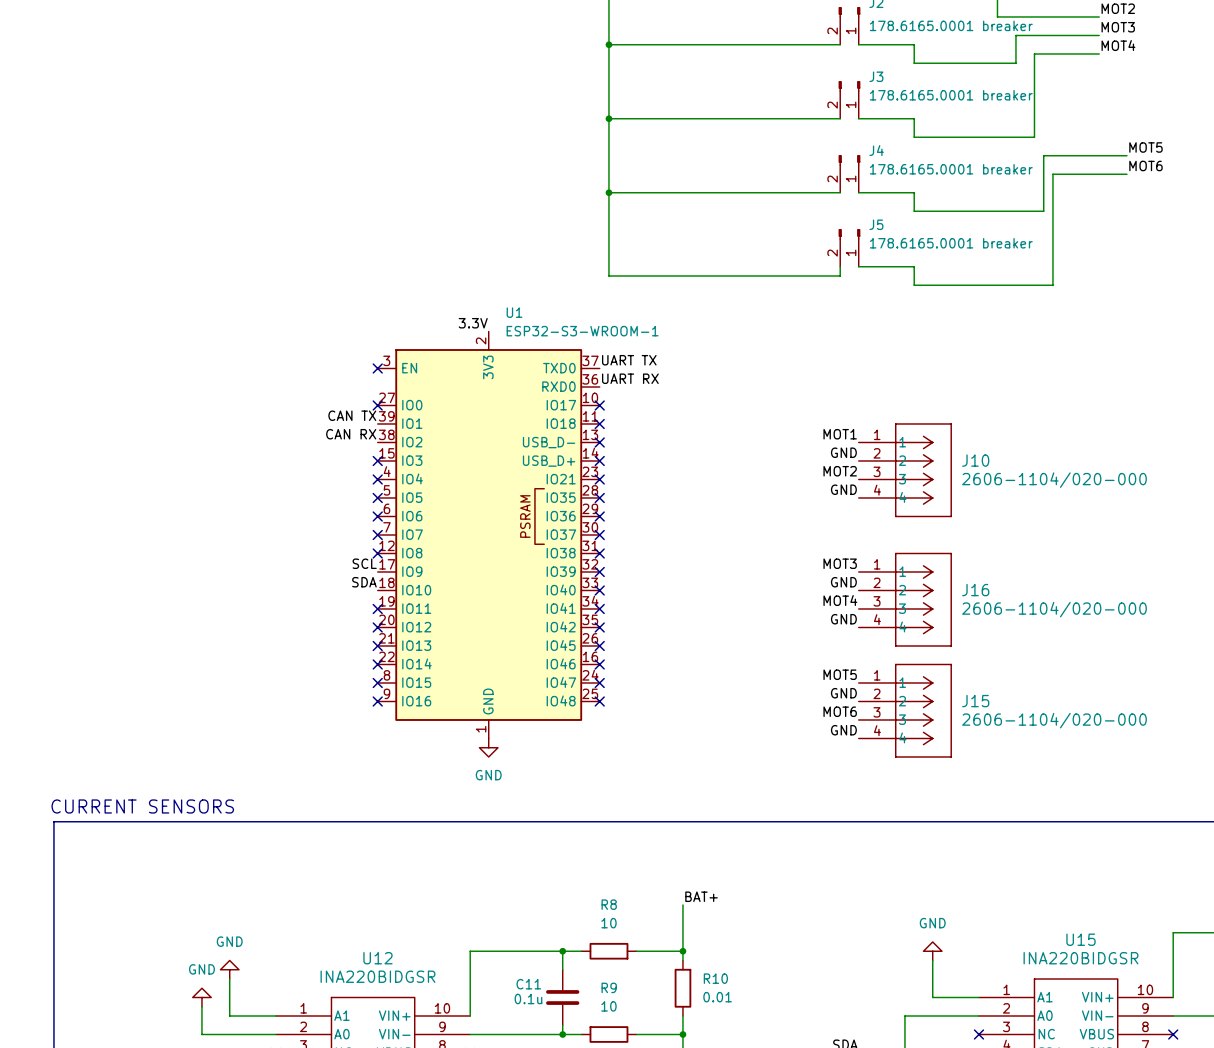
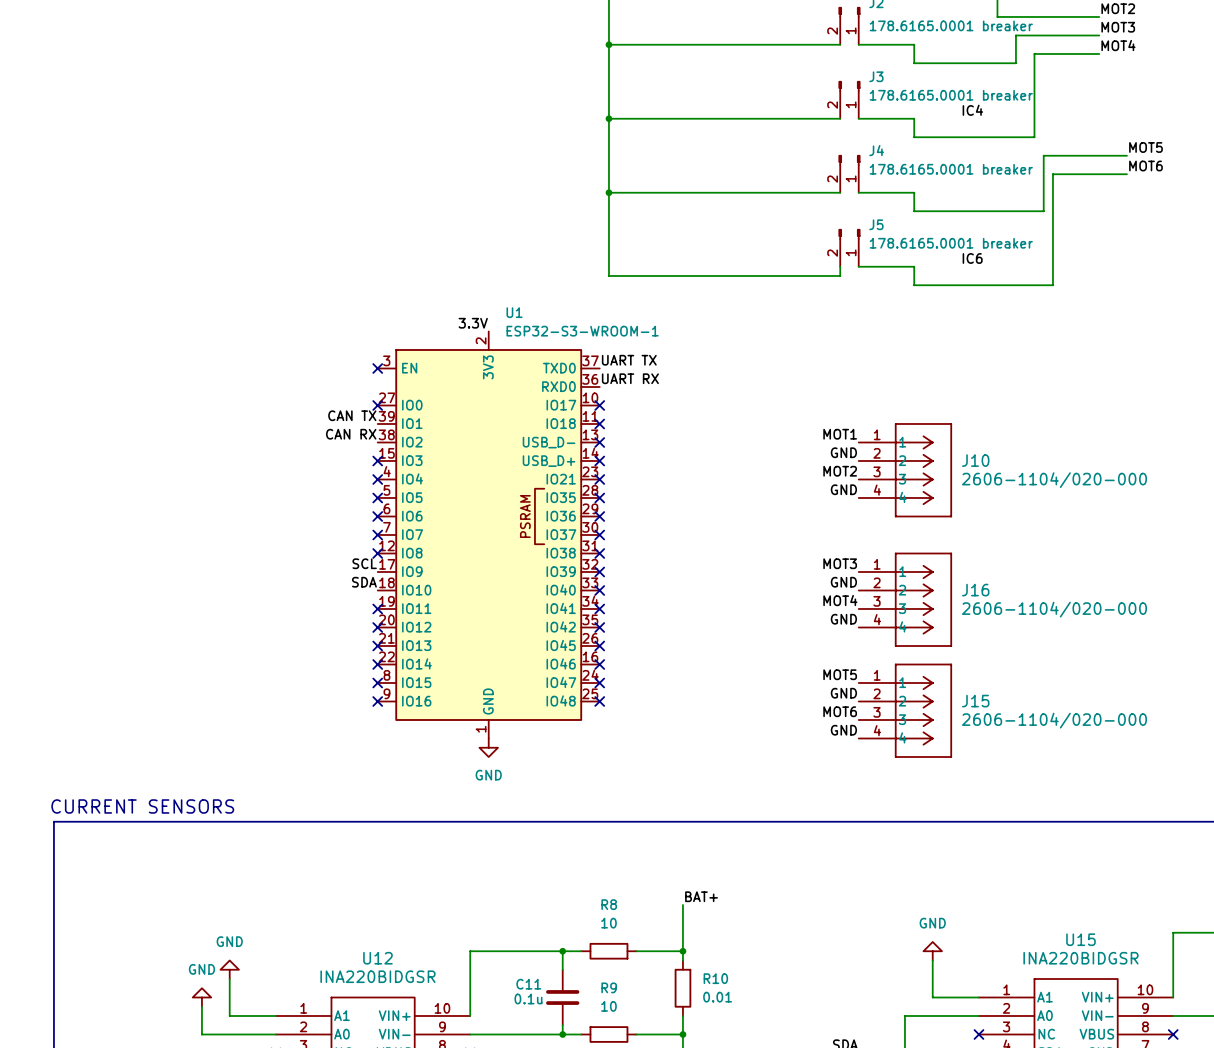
label: none -> IC4 (972, 110)
label: none -> IC6 (972, 258)

